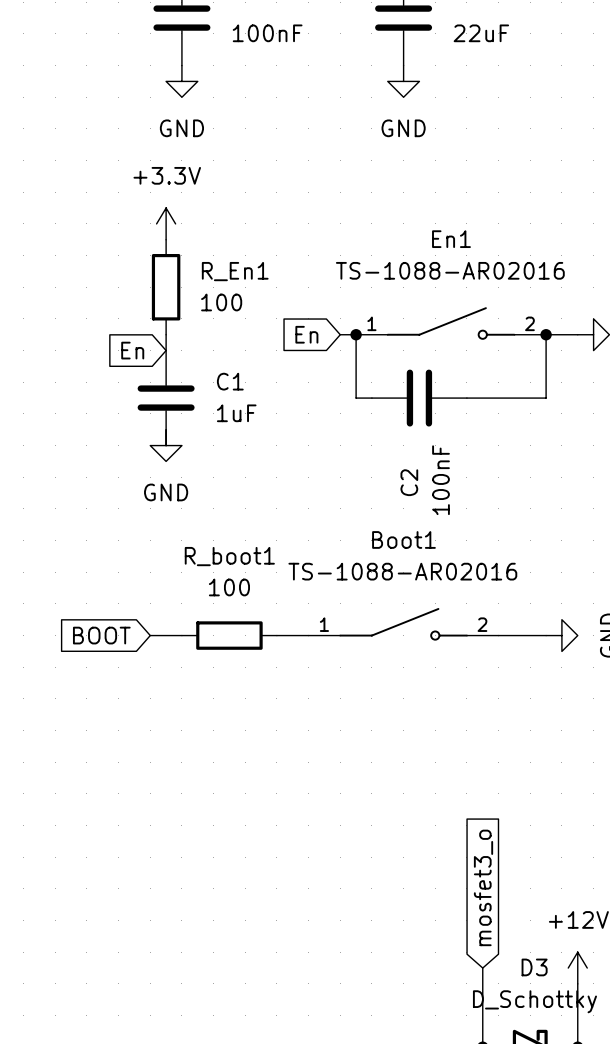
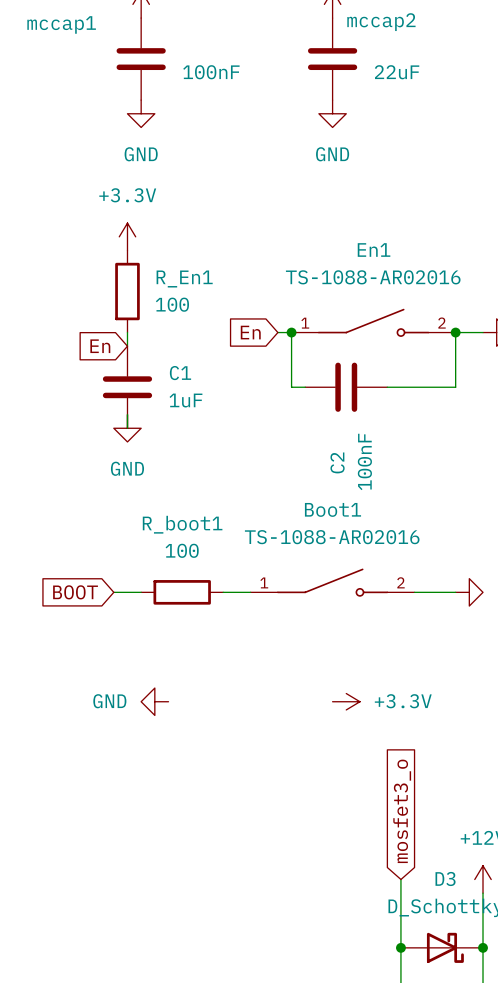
power symbol: none -> GND (154, 701)
power symbol: none -> +3.3V (346, 701)

